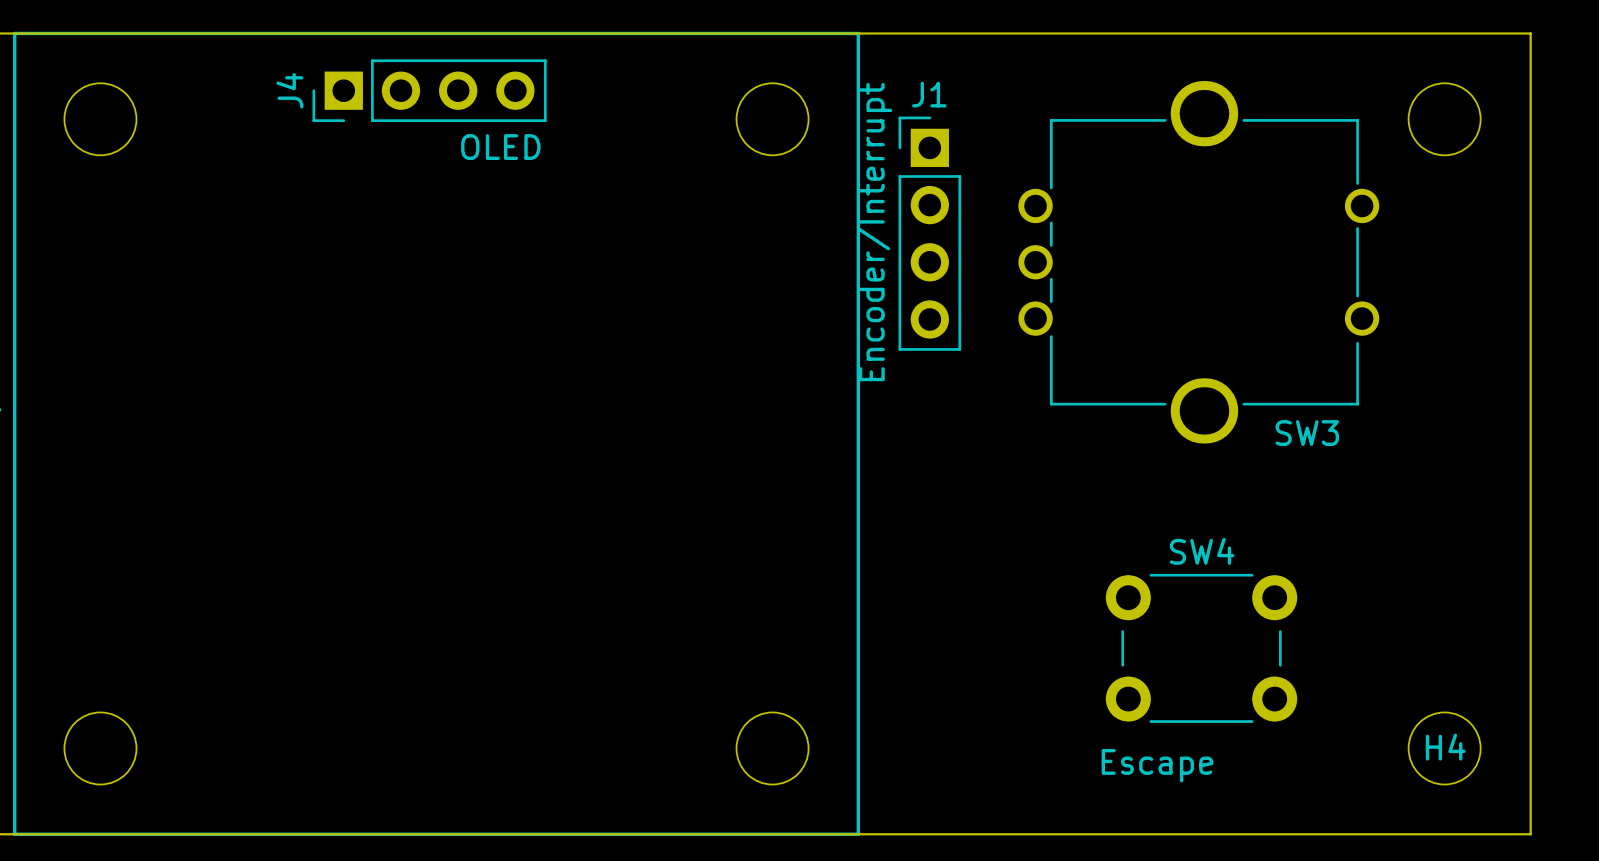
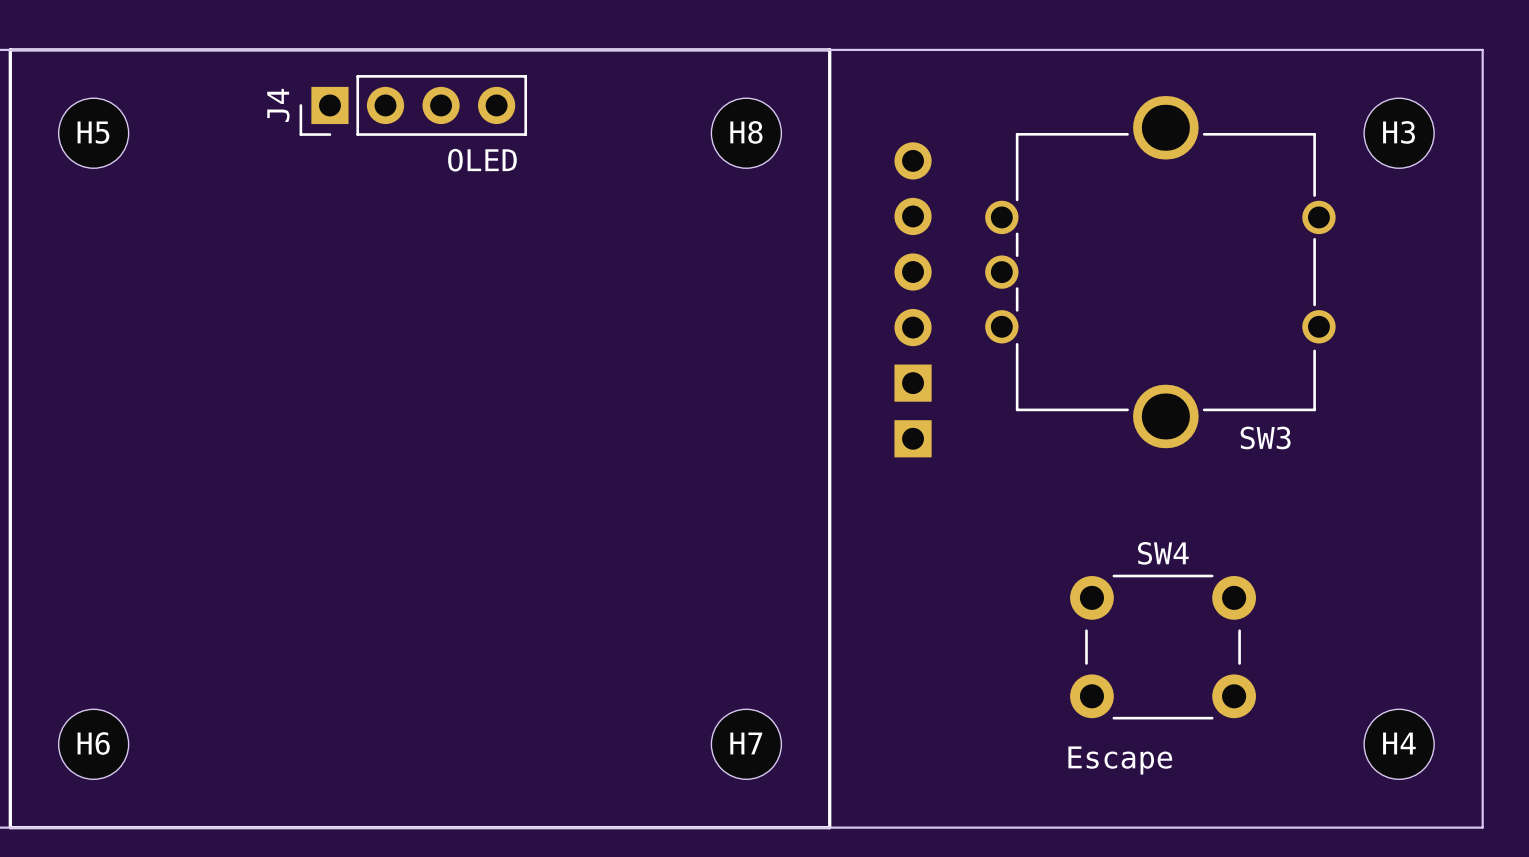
H5 name: none -> H5 (93, 132)
H8 name: none -> H8 (746, 132)
H3 name: none -> H3 (1399, 132)
J1: Encoder/Interrupt (929, 233) -> none
part: none -> (913, 272)
part: none -> (913, 438)
H6 name: none -> H6 (93, 743)
H7 name: none -> H7 (746, 743)

